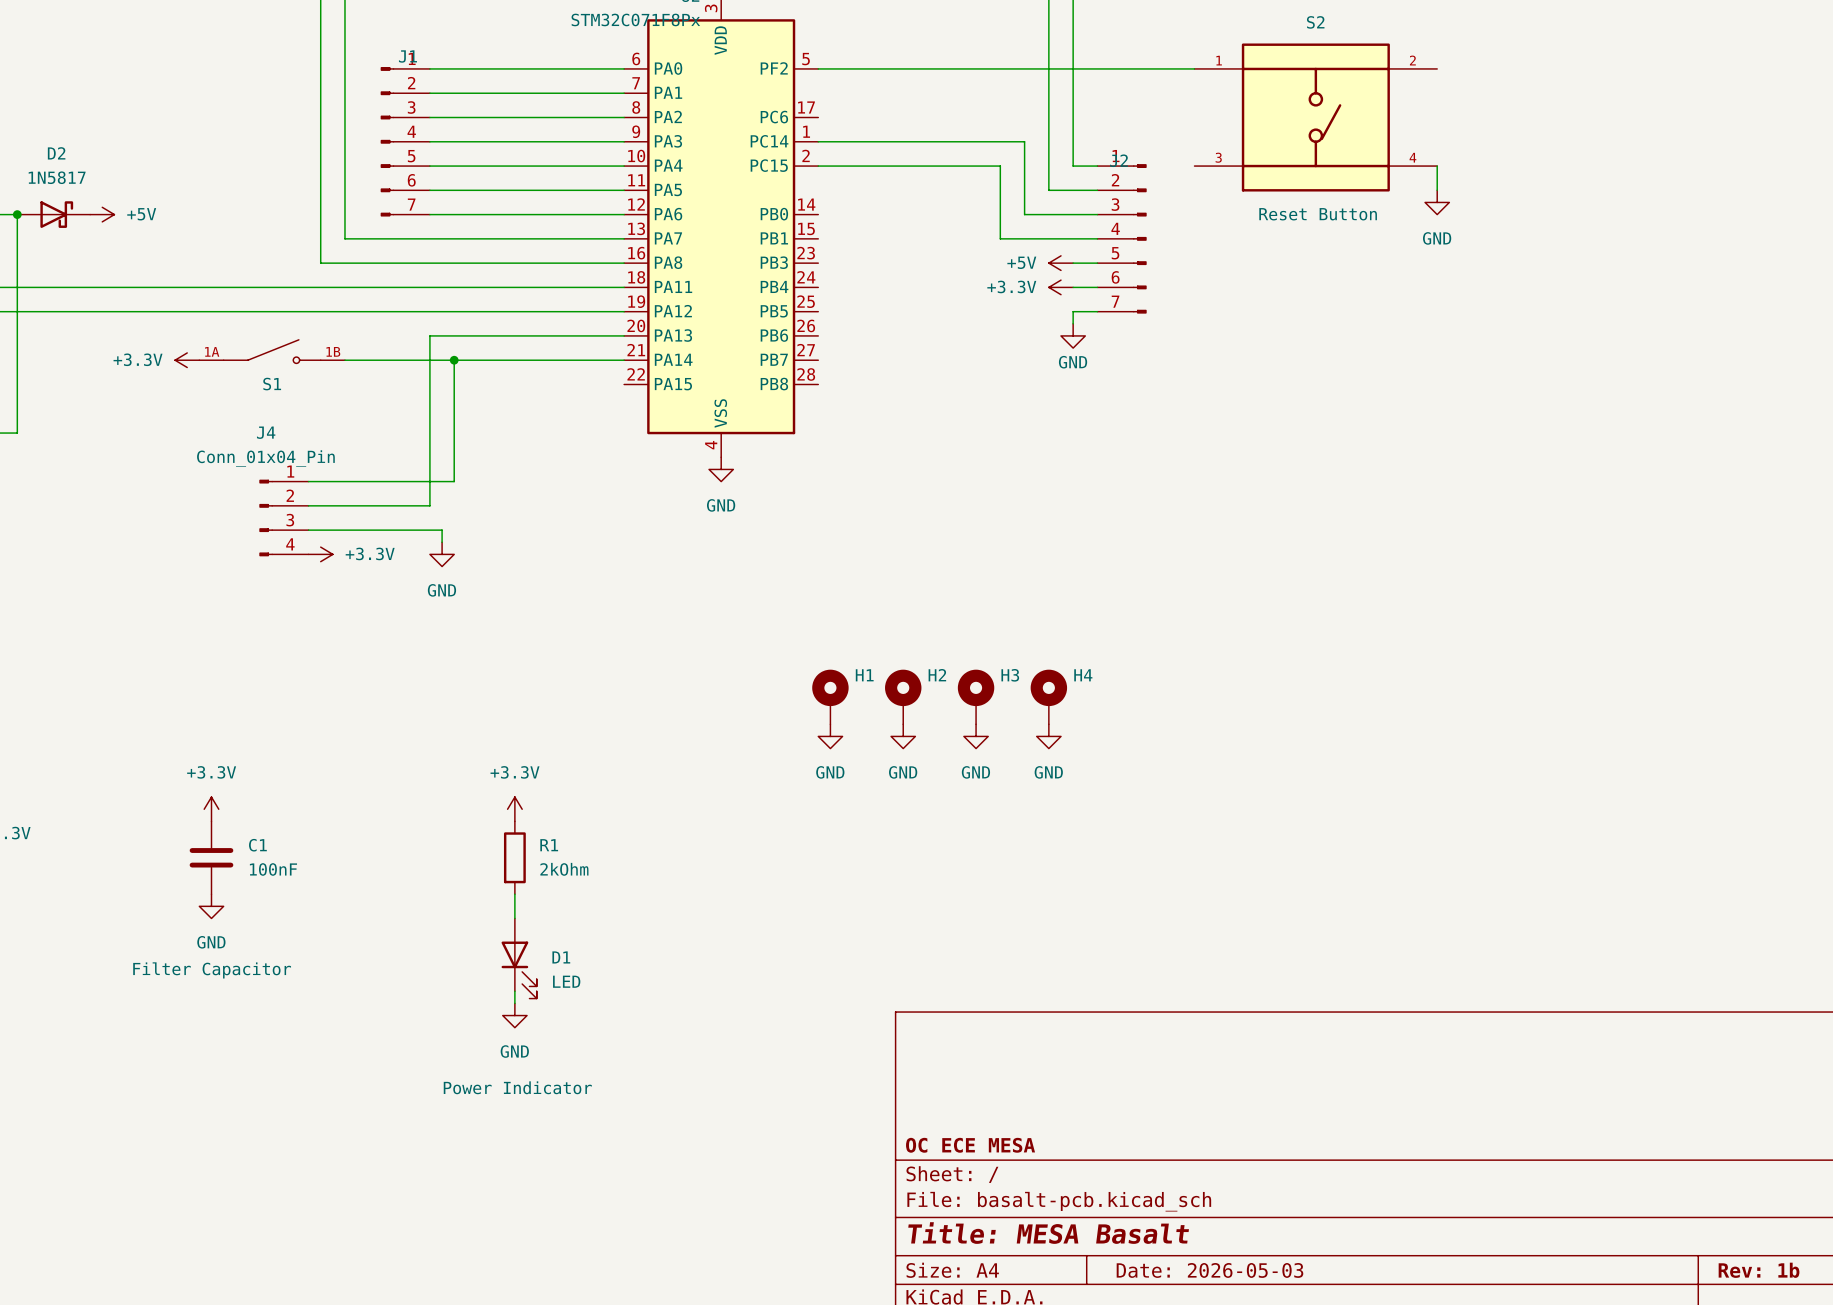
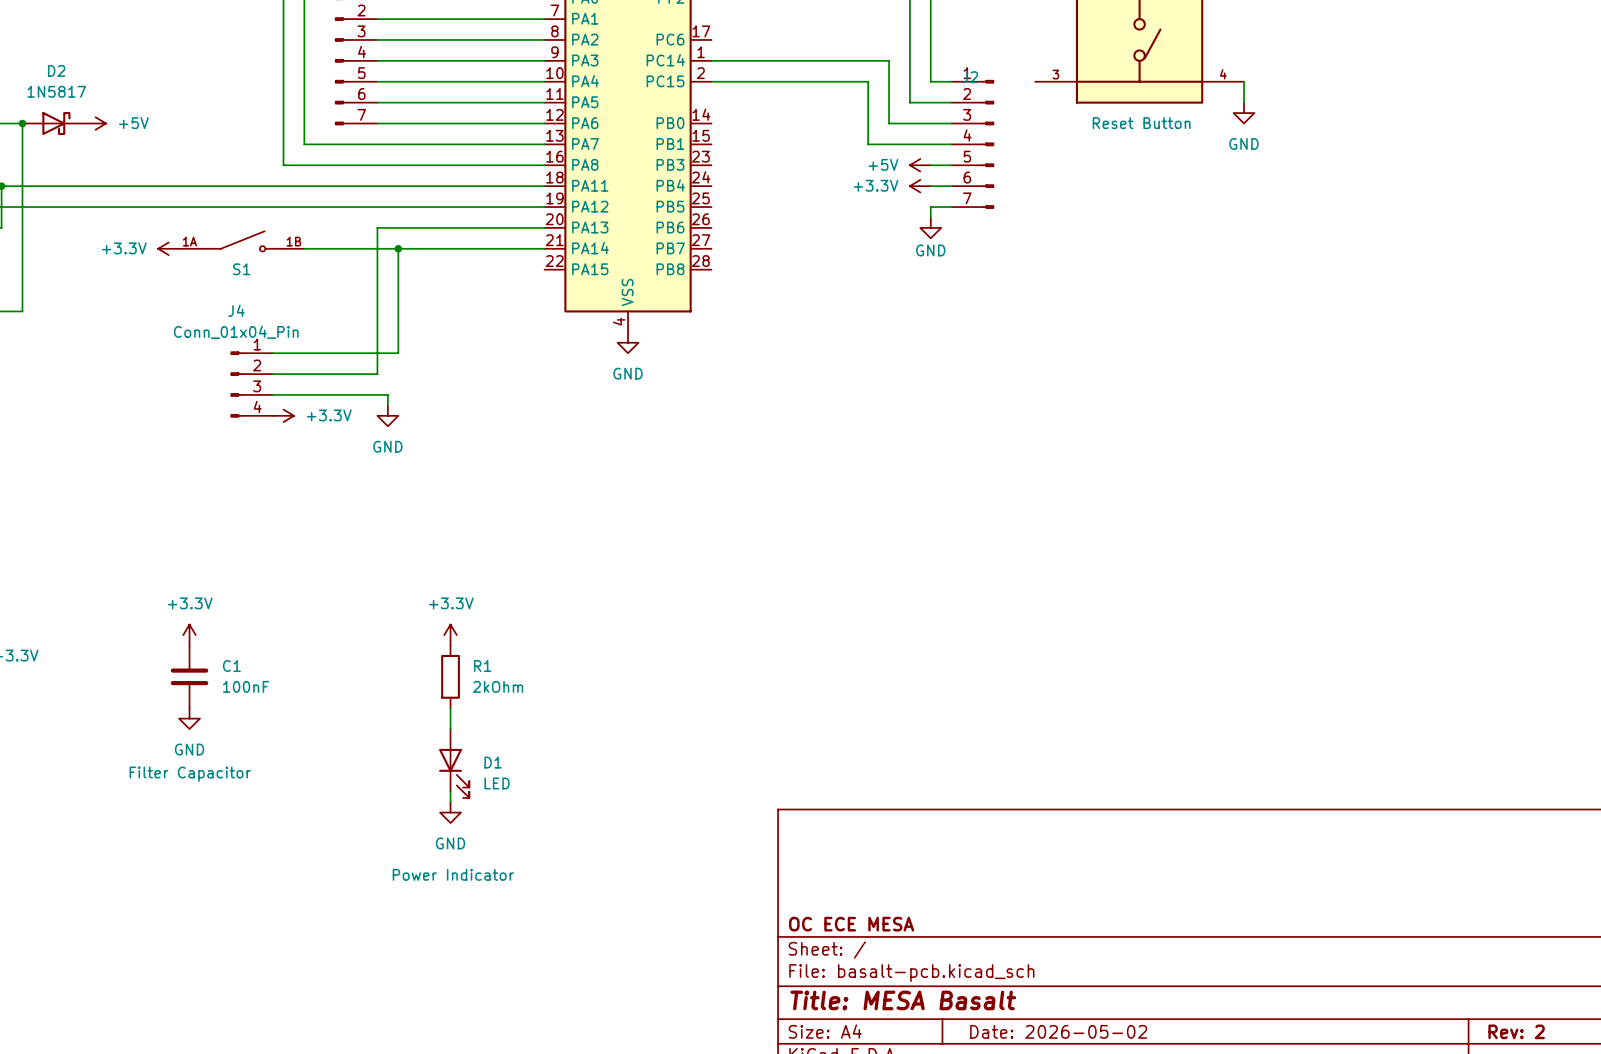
H1: (830, 696) -> none
H2: (903, 696) -> none
H3: (976, 696) -> none
H4: (1048, 696) -> none
power symbol: GND (830, 736) -> none
power symbol: GND (903, 736) -> none
power symbol: GND (976, 736) -> none
power symbol: GND (1048, 736) -> none
title block: Date: 2026-05-03 (1209, 1270) -> Date: 2026-05-02 (1058, 1031)
title block: Rev: 1b (1759, 1270) -> Rev: 2 (1516, 1031)

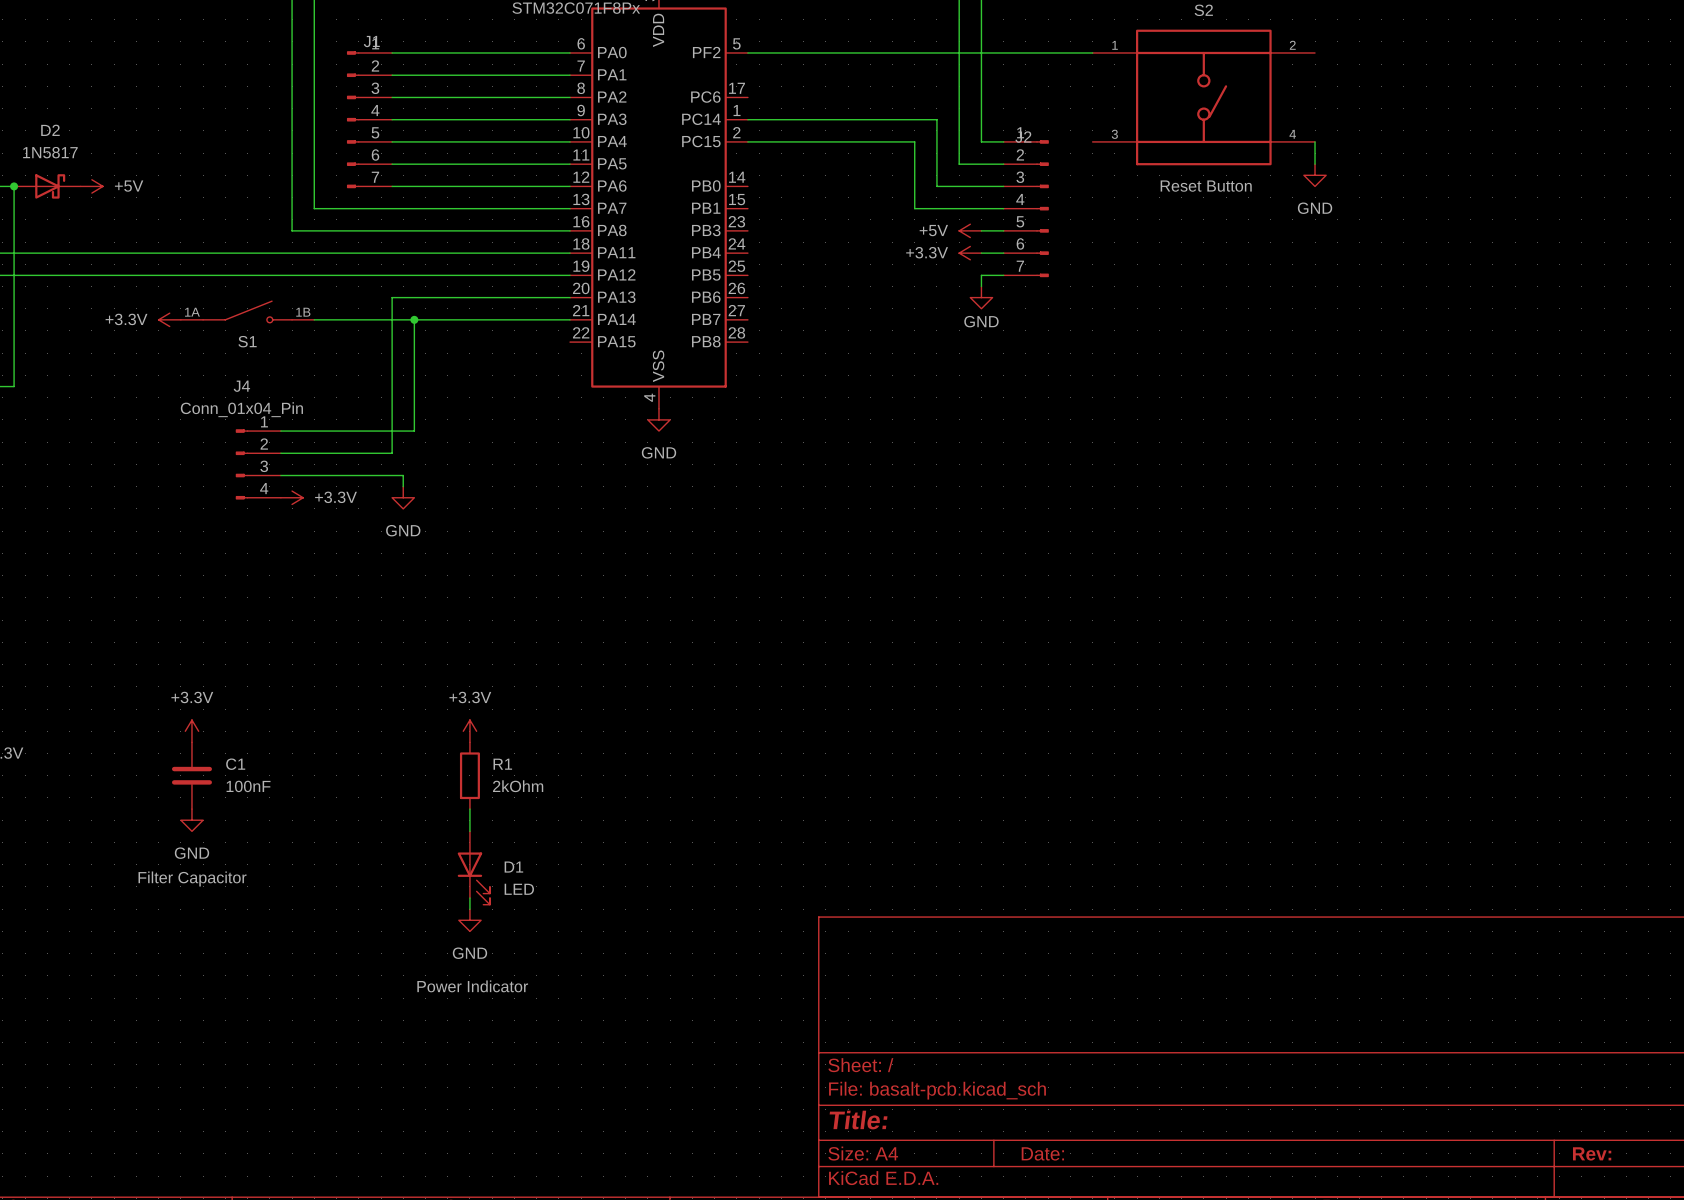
title block: OC ECE MESA (851, 924) -> none
title block: Title: MESA Basalt (903, 1000) -> Title: (858, 1120)
title block: Date: 2026-05-02 (1058, 1031) -> Date: (1042, 1153)
title block: Rev: 2 (1516, 1031) -> Rev: (1592, 1153)

